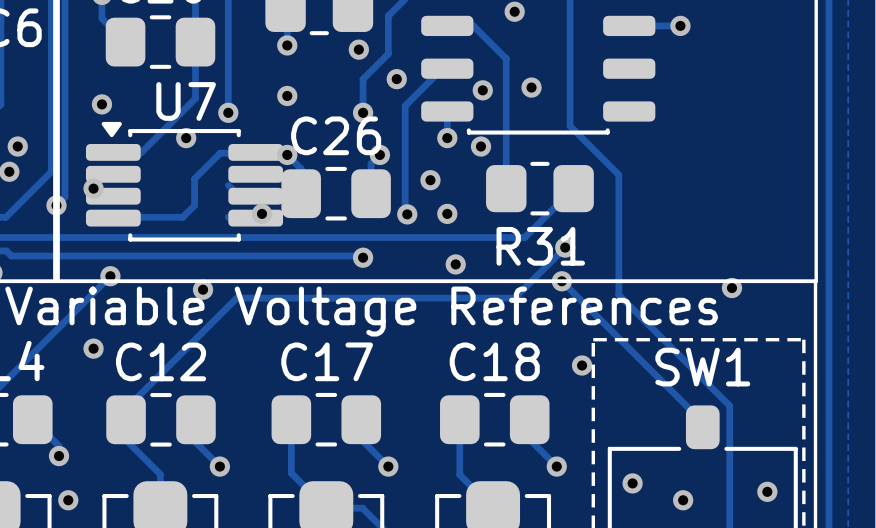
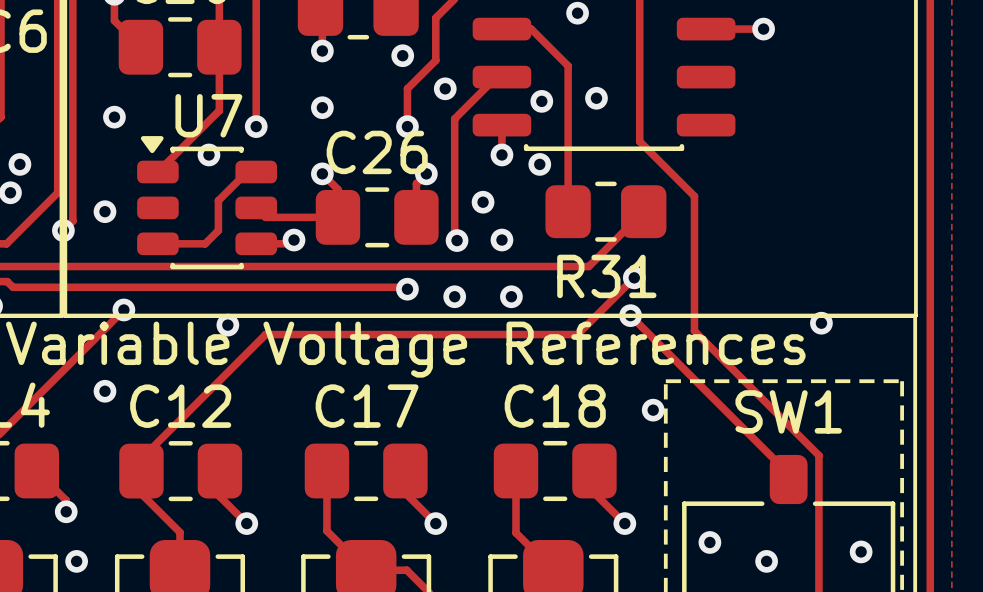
U7 footprint: [85, 121, 284, 242] -> [137, 136, 278, 270]
via: none -> (454, 296)

